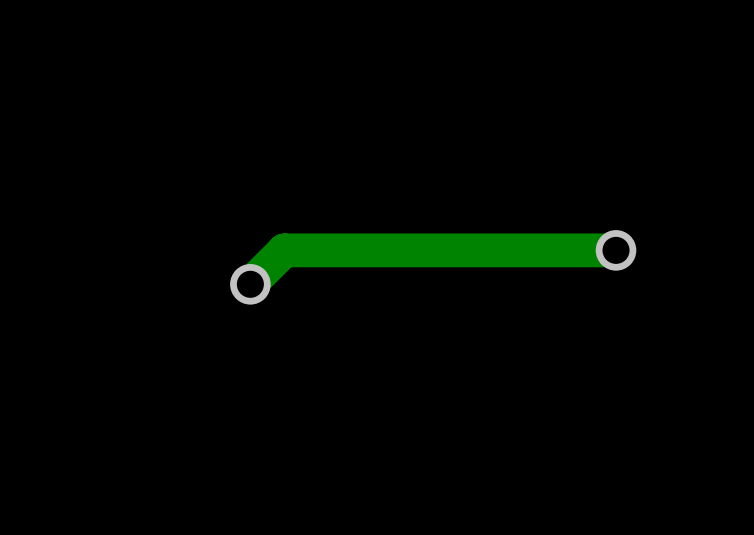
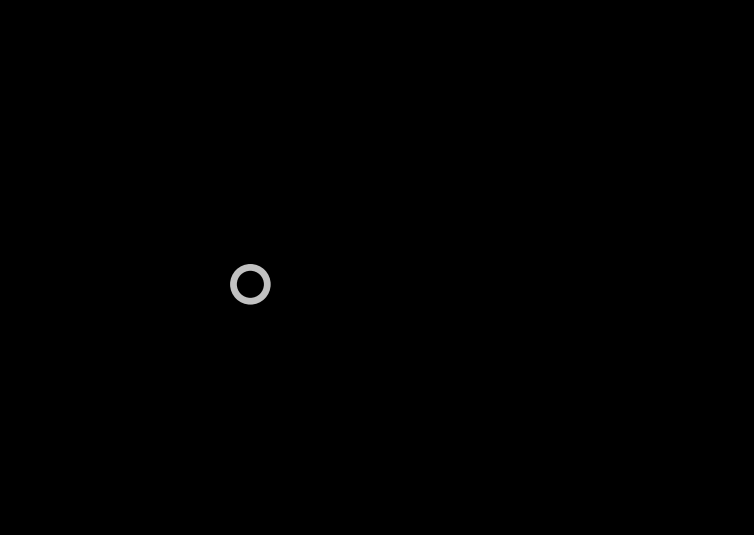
track: (616, 250) (284, 250) (250, 284) -> none
via: (616, 250) -> none

